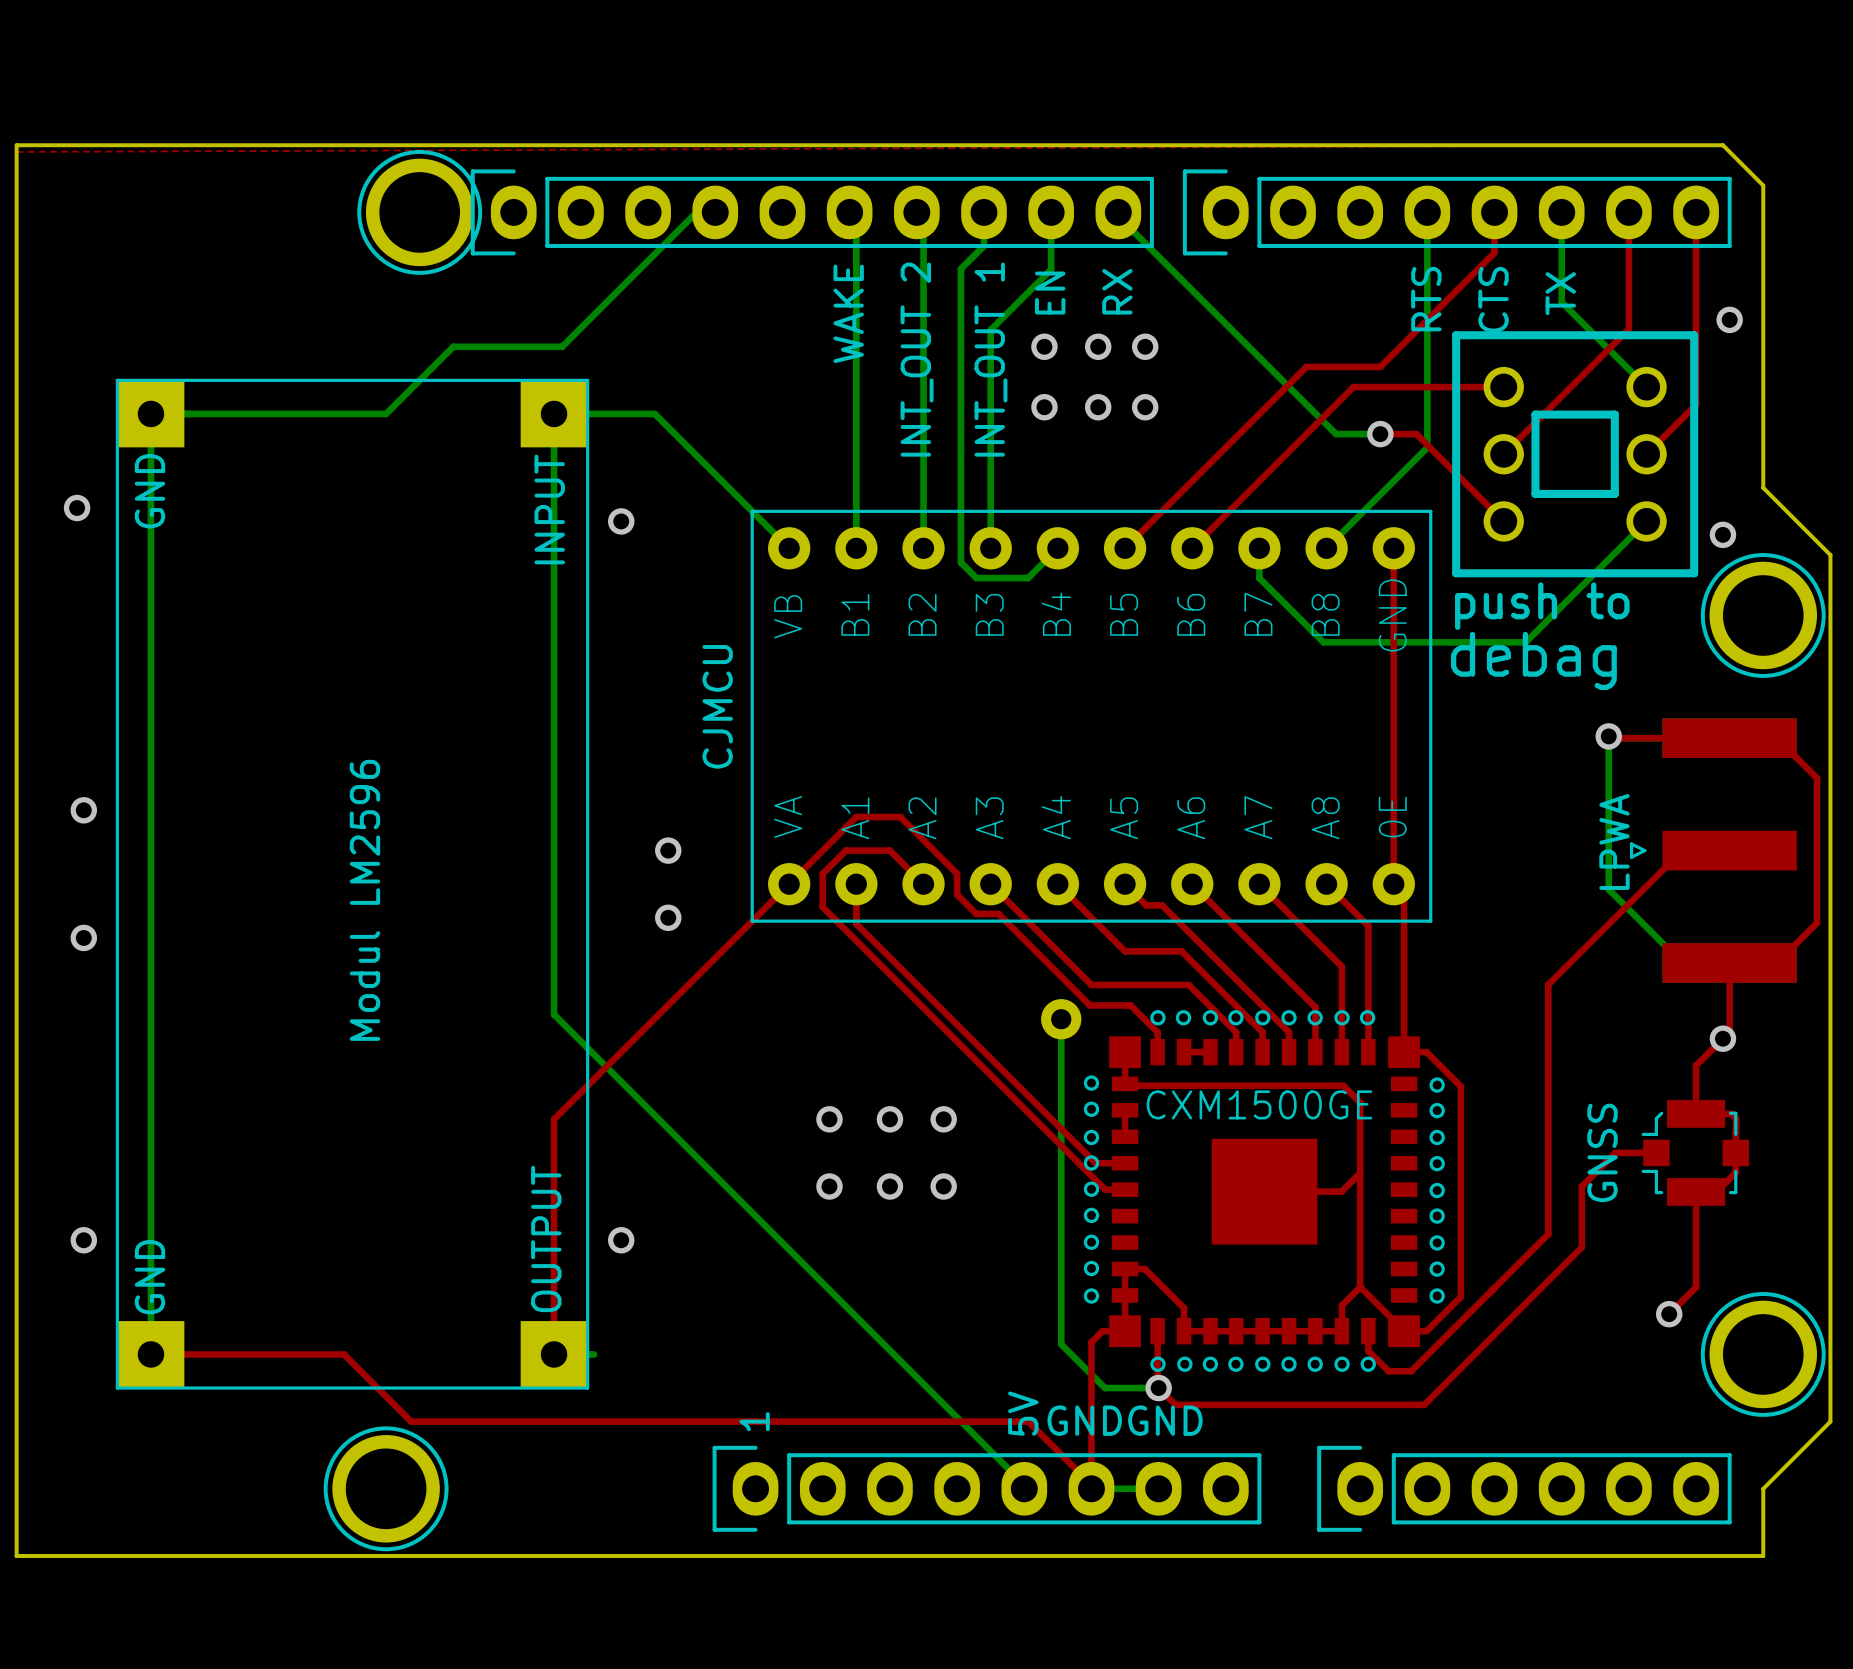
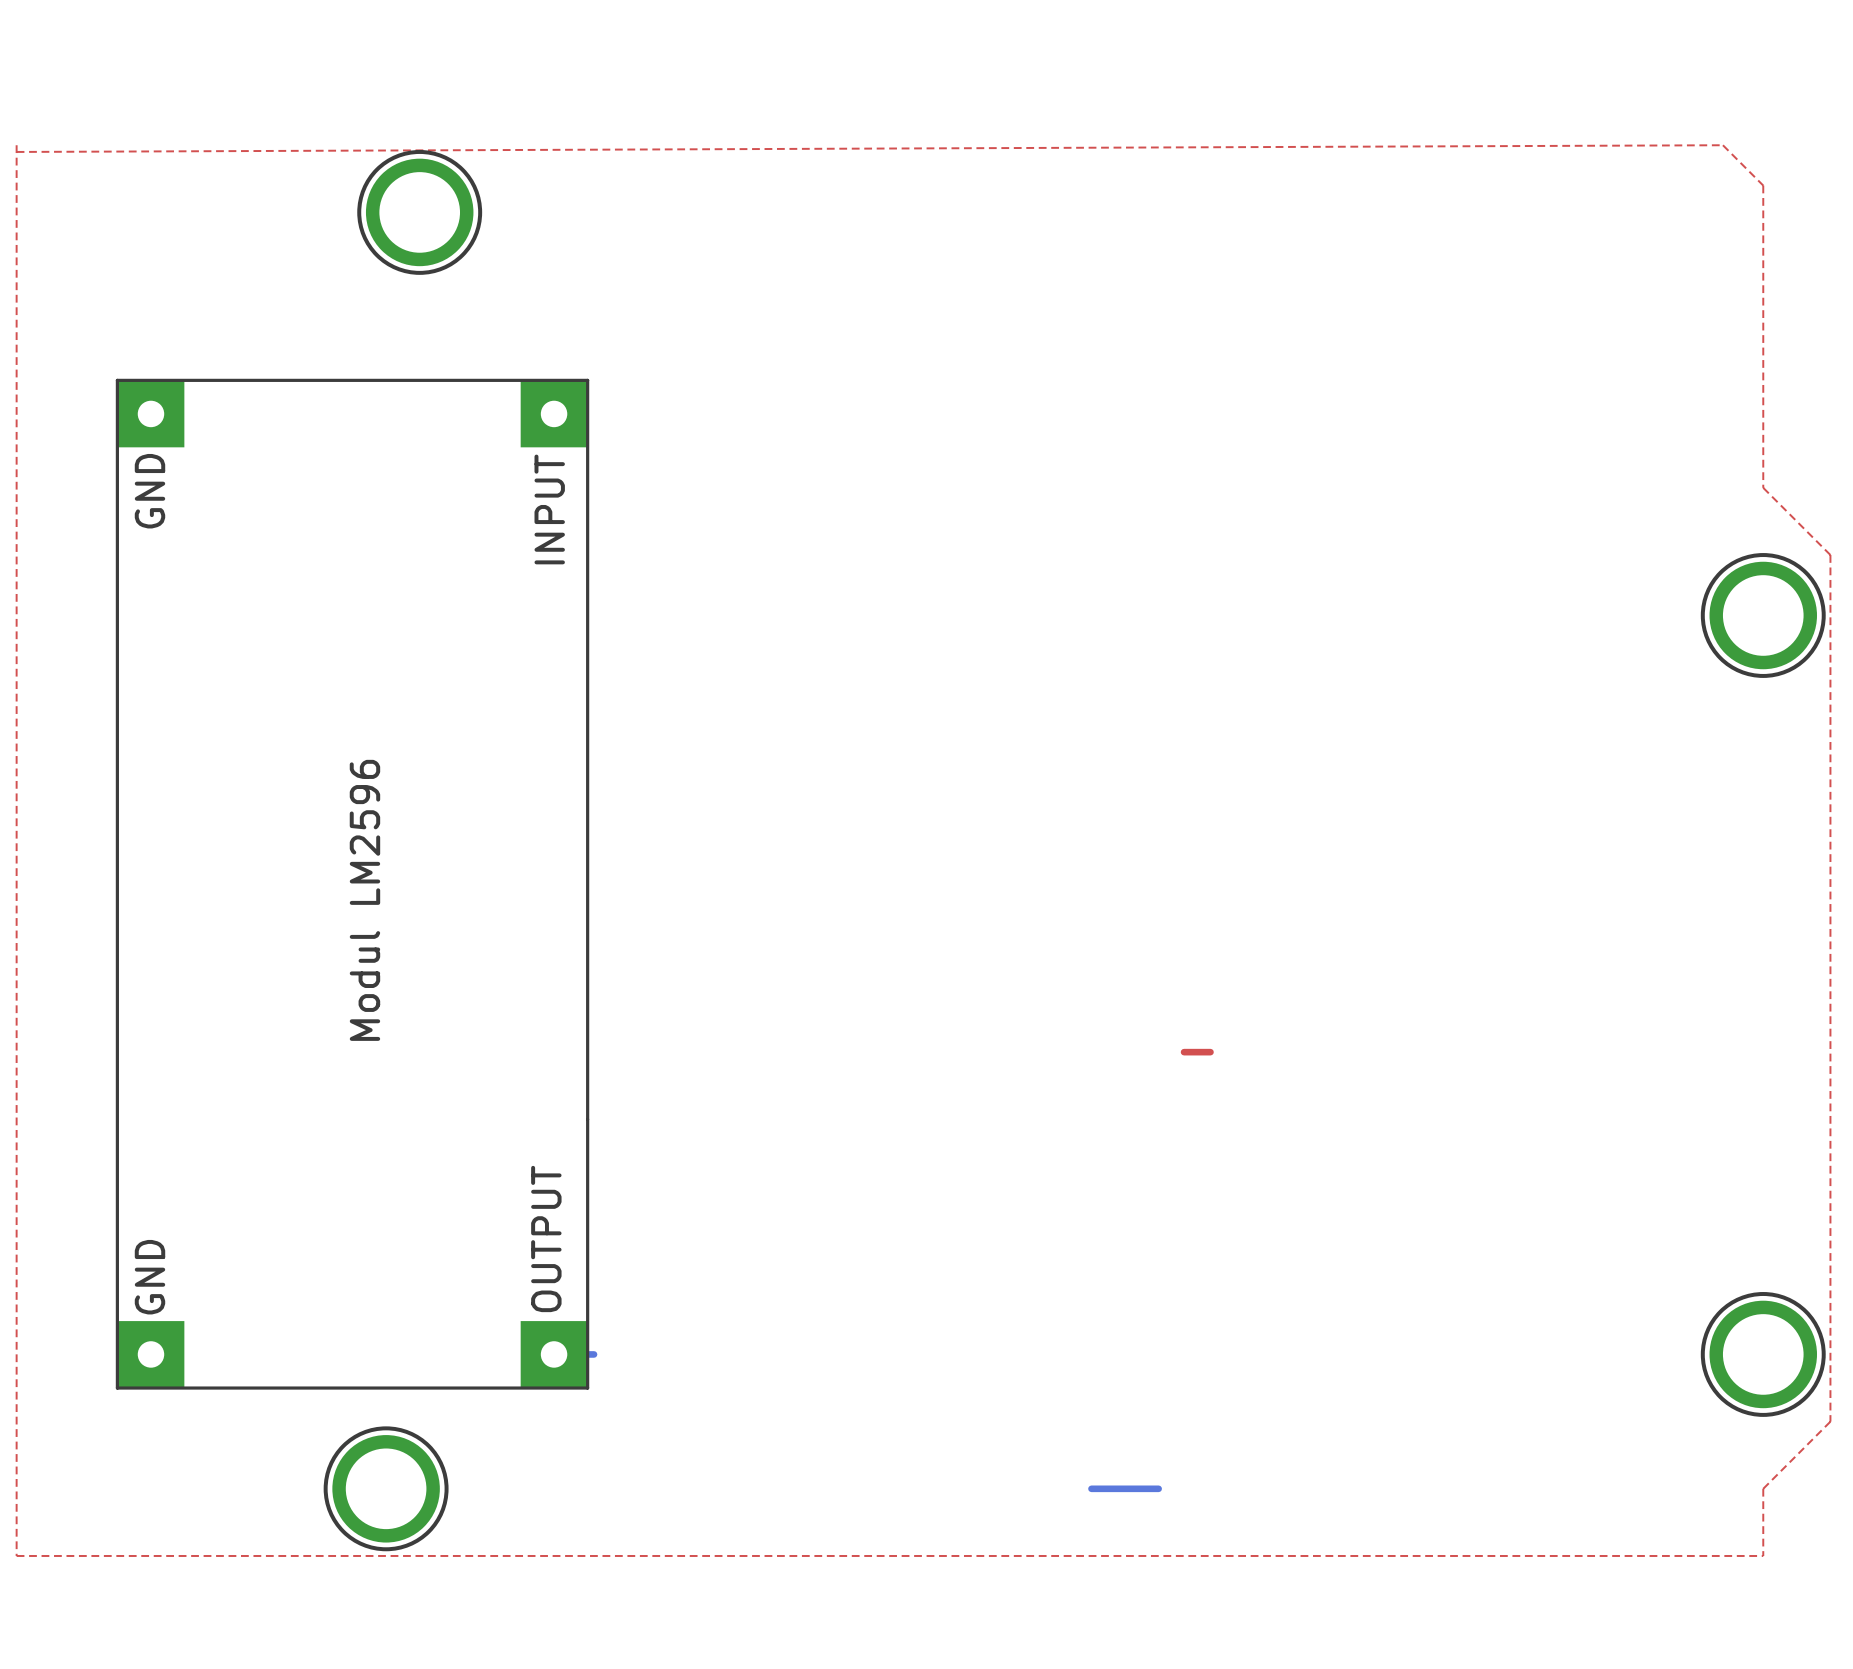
board edge: (16, 145) (16, 1555) (1763, 1555) (1763, 1488) (1830, 1421) (1830, 555) (1763, 487) (1763, 185) (1722, 145) (16, 145) -> none
bottom track: (715, 212) (696, 212) (562, 346) (453, 346) (386, 413) (150, 413) (150, 1354) -> none
part: (812, 212) -> none
bottom track: (849, 212) (856, 219) (856, 548) -> none
bottom track: (916, 212) (923, 219) (923, 548) -> none
bottom track: (983, 212) (983, 245) (960, 268) (960, 562) (976, 578) (1028, 578) (1057, 548) -> none
bottom track: (1051, 212) (1051, 269) (990, 329) (990, 548) -> none
bottom track: (1118, 212) (1118, 216) (1336, 434) (1380, 434) -> none
bottom track: (1427, 212) (1427, 447) (1326, 548) -> none
part: (1457, 212) -> none
top track: (1494, 212) (1494, 252) (1380, 366) (1306, 366) (1125, 548) -> none
bottom track: (1561, 212) (1561, 302) (1646, 387) -> none
top track: (1628, 212) (1628, 329) (1503, 454) -> none
top track: (1696, 212) (1696, 404) (1646, 454) -> none
via: (1729, 319) -> none
via: (1044, 346) -> none
via: (1098, 346) -> none
via: (1145, 346) -> none
top track: (1503, 387) (1353, 387) (1192, 548) -> none
via: (1044, 407) -> none
via: (1098, 407) -> none
via: (1145, 407) -> none
top track: (1380, 434) (1416, 434) (1503, 521) -> none
via: (1380, 434) -> none
push to: (1575, 454) -> none
via: (77, 508) -> none
via: (621, 521) -> none
bottom track: (1646, 521) (1525, 642) (1323, 642) (1259, 578) (1259, 548) -> none
via: (1722, 534) -> none
bottom track: (789, 548) (654, 413) (554, 413) (554, 1014) (1024, 1484) (1024, 1488) -> none
top track: (1393, 548) (1393, 884) (1404, 894) (1404, 1052) (1426, 1052) (1460, 1086) (1460, 1296) (1426, 1331) (1404, 1331) -> none
text: debag (1533, 660) -> none
CJMCU: (1091, 716) -> none
top track: (1608, 736) (1610, 738) (1777, 738) (1817, 778) (1817, 923) (1777, 963) (1729, 963) (1729, 1031) (1696, 1065) (1696, 1113) (1731, 1113) (1736, 1118) (1736, 1132) -> none
via: (1608, 736) -> none
bottom track: (1729, 738) (1610, 738) (1608, 736) (1608, 889) (1682, 963) (1729, 963) -> none
via: (83, 810) -> none
via: (668, 850) -> none
LPWA: (1713, 850) -> none
top track: (1729, 850) (1682, 850) (1548, 984) (1548, 1234) (1411, 1371) (1388, 1371) (1368, 1351) (1368, 1331) -> none
top track: (856, 884) (856, 923) (1095, 1163) (1125, 1163) -> none
top track: (923, 884) (889, 850) (845, 850) (822, 873) (822, 907) (1105, 1189) (1125, 1189) -> none
top track: (990, 884) (1091, 984) (1188, 984) (1236, 1032) (1236, 1052) -> none
top track: (1057, 884) (1125, 951) (1181, 951) (1262, 1032) (1262, 1052) -> none
top track: (1125, 884) (1146, 905) (1162, 905) (1289, 1032) (1289, 1052) -> none
top track: (1192, 884) (1315, 1007) (1315, 1052) -> none
top track: (1259, 884) (1341, 966) (1341, 1052) -> none
top track: (1326, 884) (1368, 925) (1368, 1052) -> none
via: (668, 917) -> none
via: (83, 937) -> none
bottom track: (1061, 1019) (1061, 1344) (1104, 1388) (1158, 1388) -> none
via: (1722, 1038) -> none
top track: (1125, 1052) (1125, 1085) (1343, 1085) (1360, 1102) (1360, 1287) (1341, 1305) (1341, 1331) (1184, 1331) (1184, 1308) (1144, 1269) (1125, 1269) (1125, 1331) (1102, 1331) (1091, 1342) (1091, 1488) -> none
top track: (1157, 1052) (1157, 1032) (1130, 1005) (1090, 1005) (998, 913) (976, 913) (957, 894) (957, 873) (900, 817) (856, 817) (554, 1119) (554, 1354) -> none
top track: (1125, 1110) (1125, 1136) -> none
via: (829, 1119) -> none
via: (889, 1119) -> none
via: (943, 1119) -> none
top track: (1735, 1133) (1735, 1172) (1715, 1193) (1696, 1191) (1696, 1287) (1669, 1314) -> none
top track: (1656, 1152) (1615, 1152) (1581, 1186) (1581, 1247) (1424, 1404) (1175, 1404) (1157, 1386) (1157, 1331) -> none
GNSS: (1695, 1152) -> none
top track: (1360, 1173) (1341, 1191) (1264, 1191) -> none
CXM1500GE: (1242, 1185) -> none
via: (829, 1186) -> none
via: (889, 1186) -> none
via: (943, 1186) -> none
via: (83, 1240) -> none
via: (621, 1240) -> none
top track: (1360, 1287) (1404, 1330) -> none
via: (1669, 1314) -> none
top track: (150, 1354) (344, 1354) (411, 1421) (1028, 1421) (1091, 1484) -> none
via: (1158, 1388) -> none
text: 1 (754, 1421) -> none
part: (987, 1488) -> none
part: (1524, 1488) -> none

